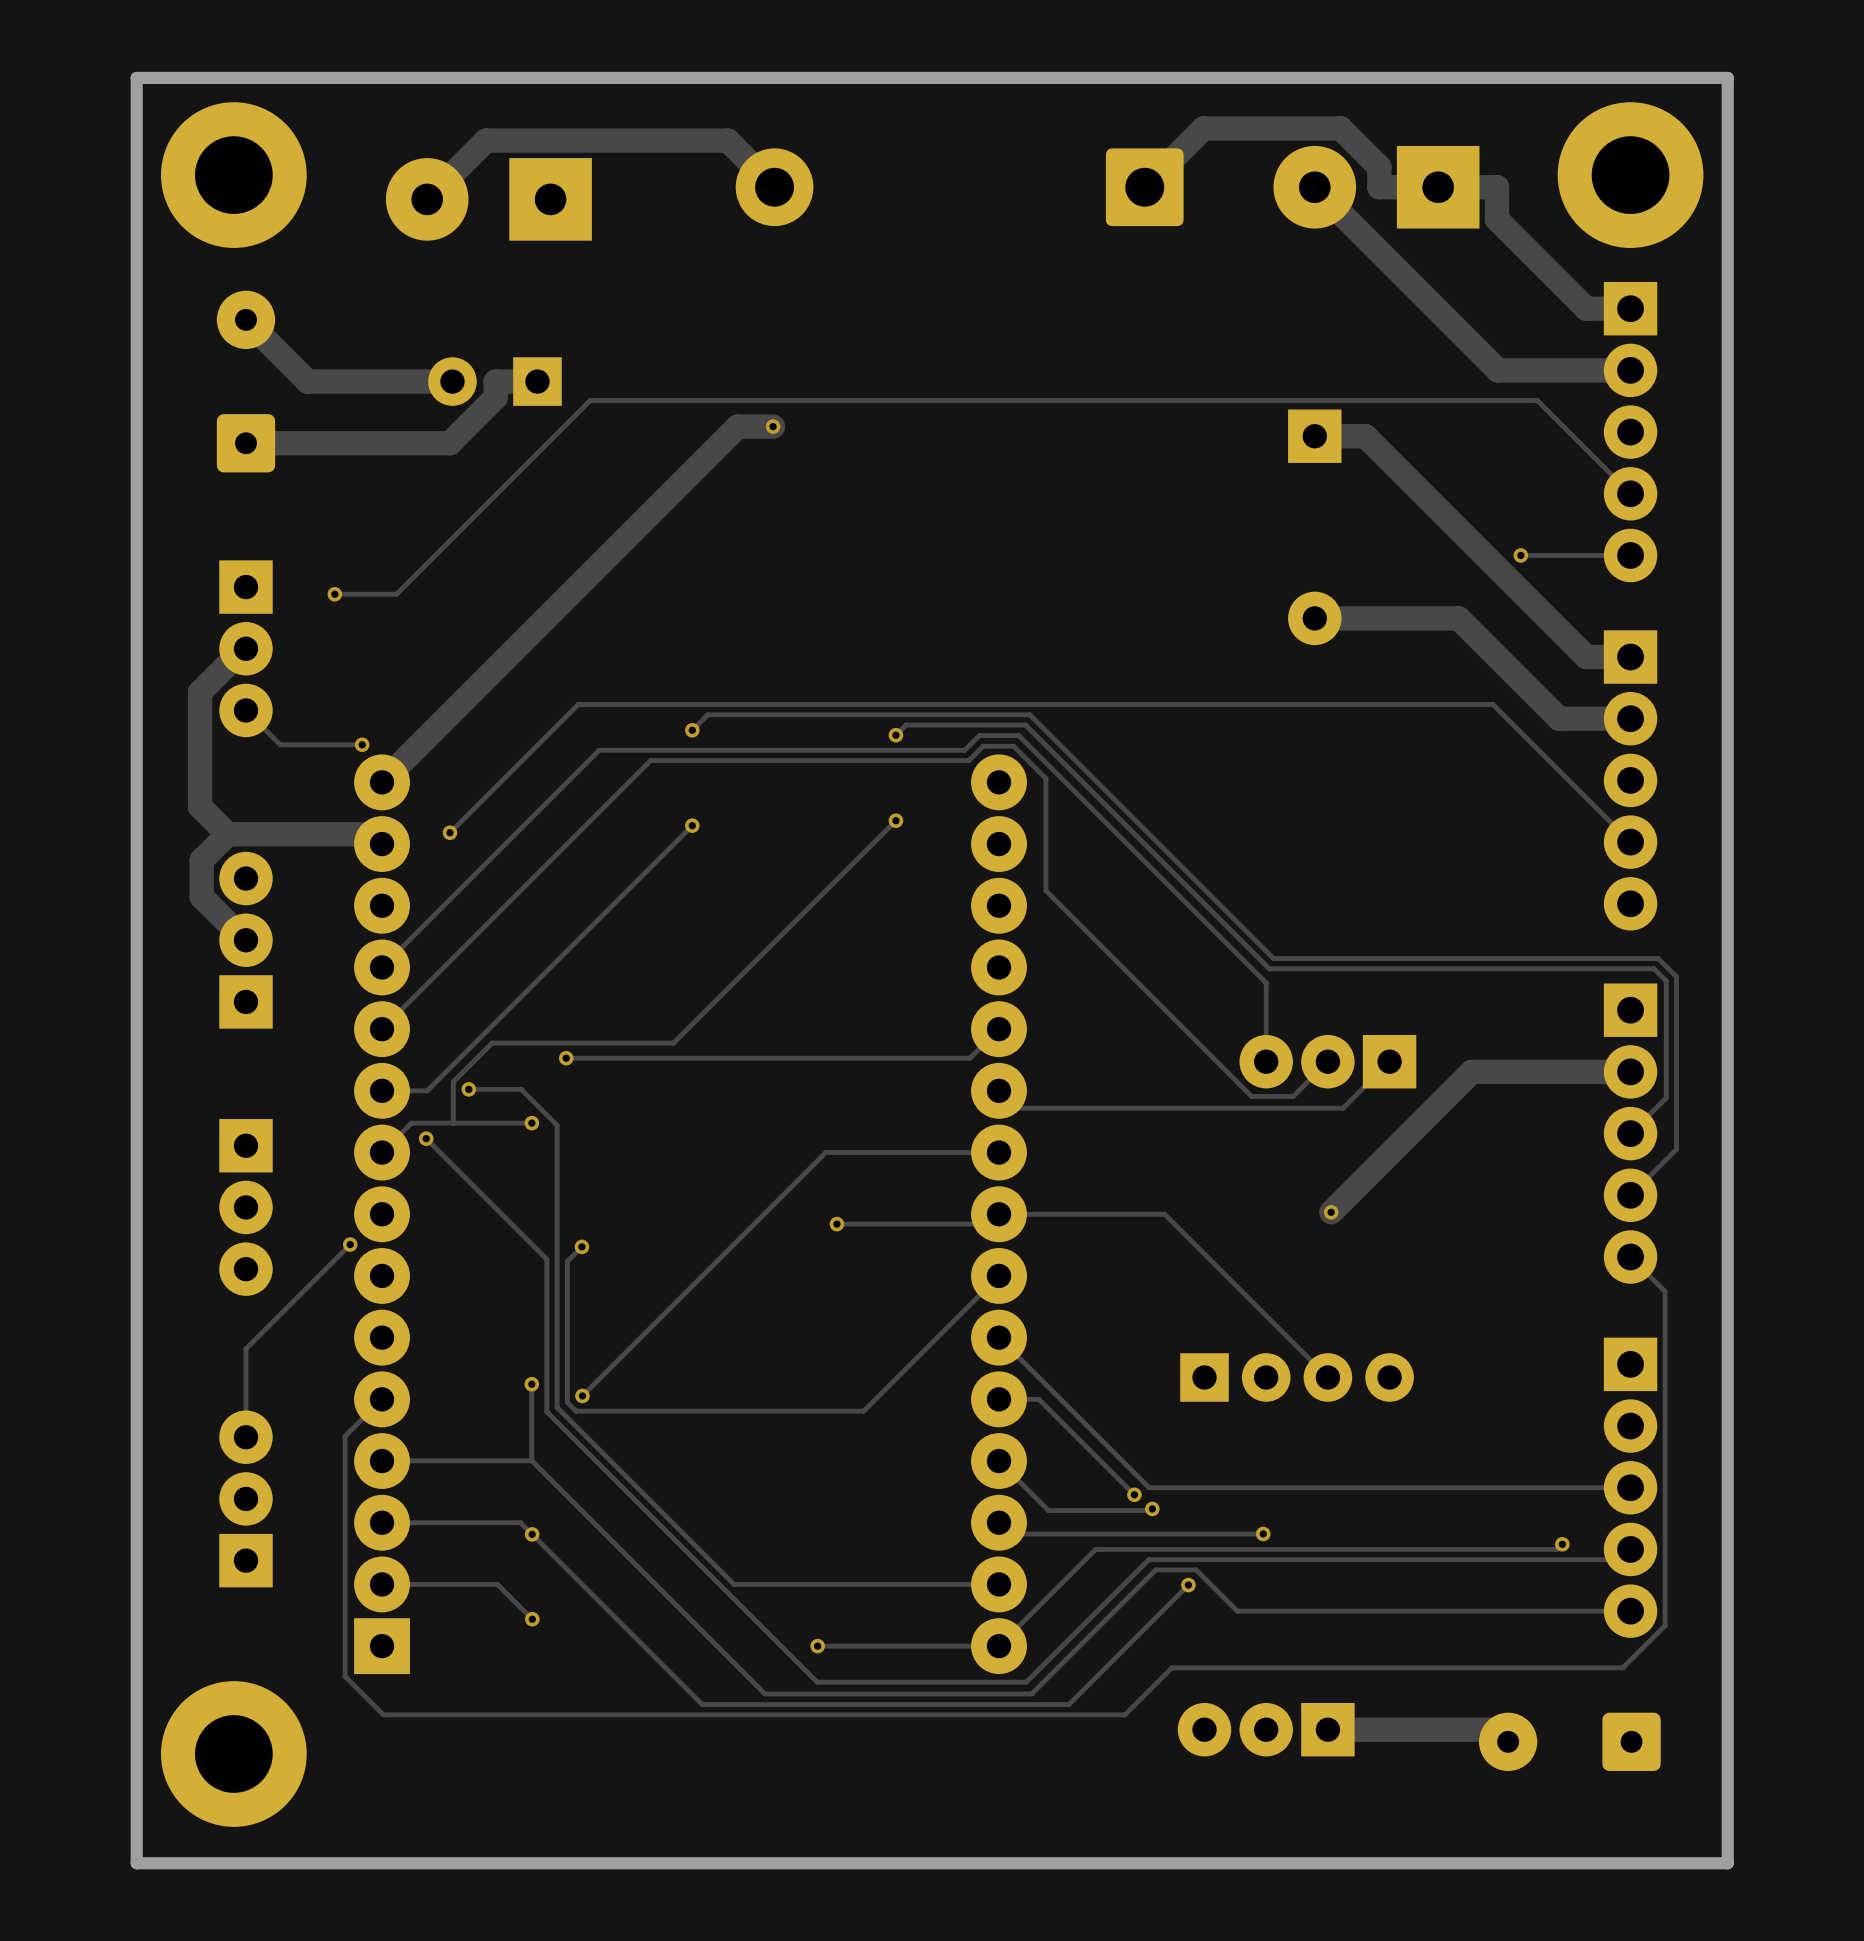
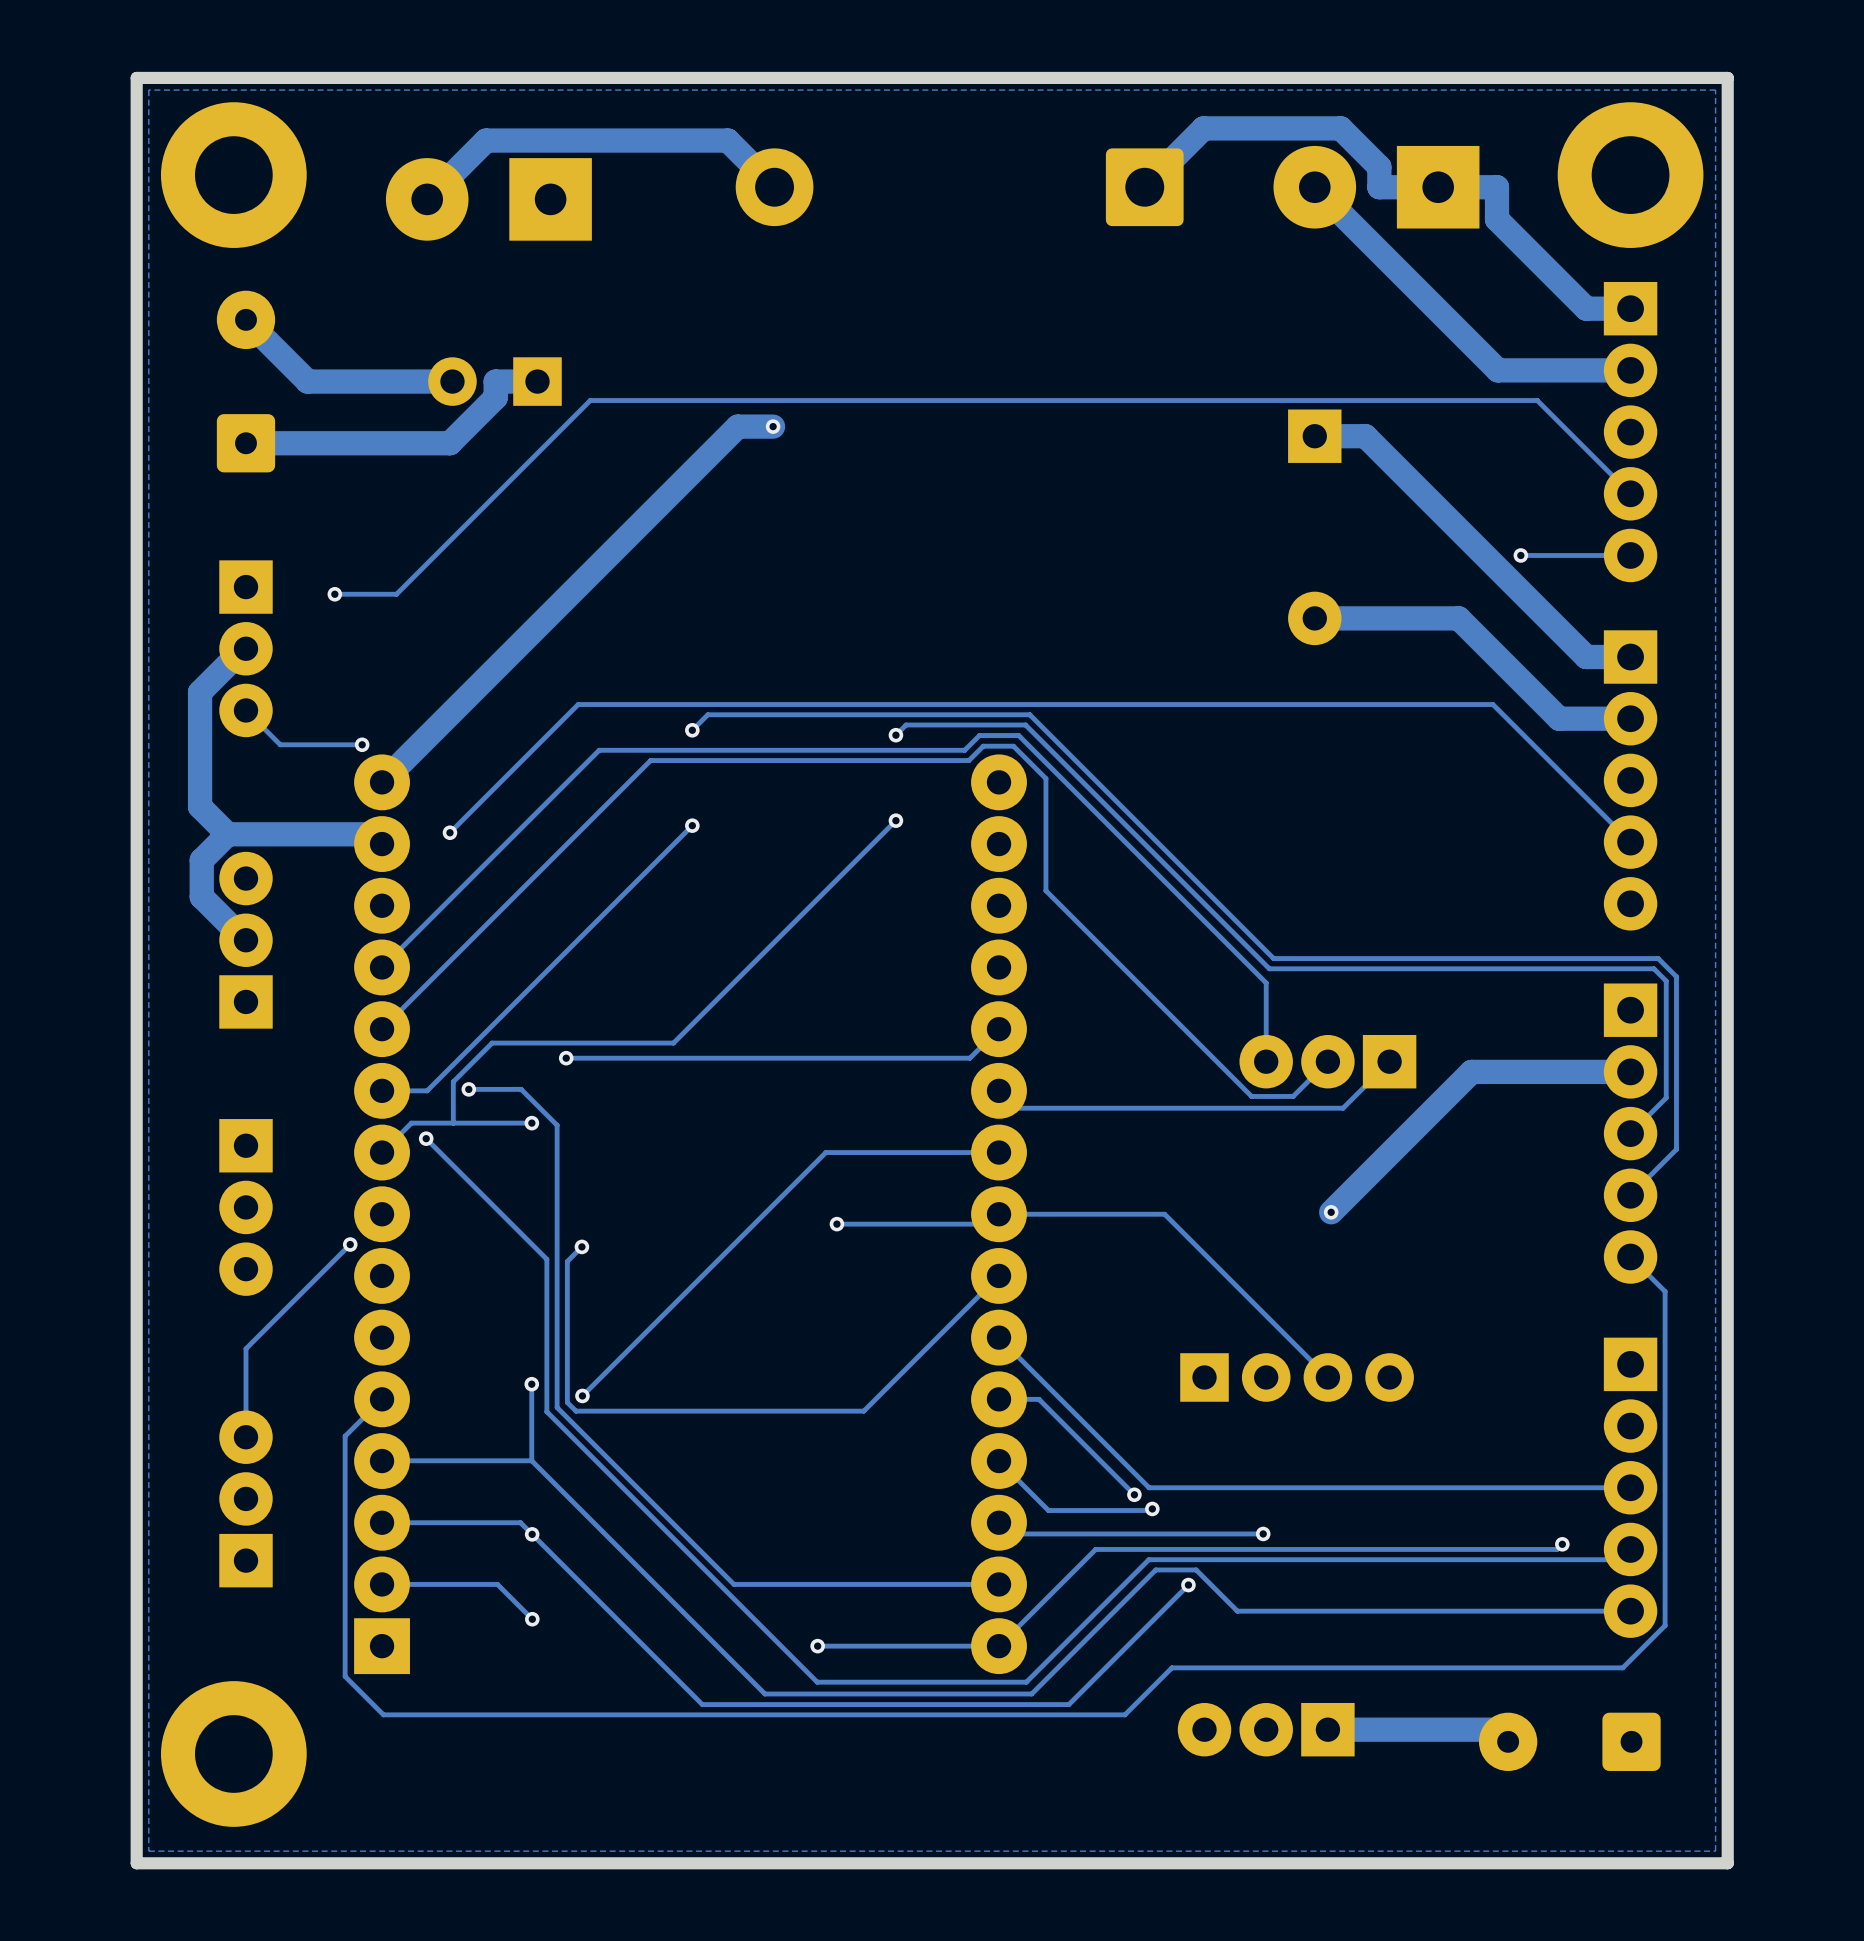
zone outline: none -> (1715, 90) (148, 90) (148, 1851) (1715, 1851) (1715, 90)

